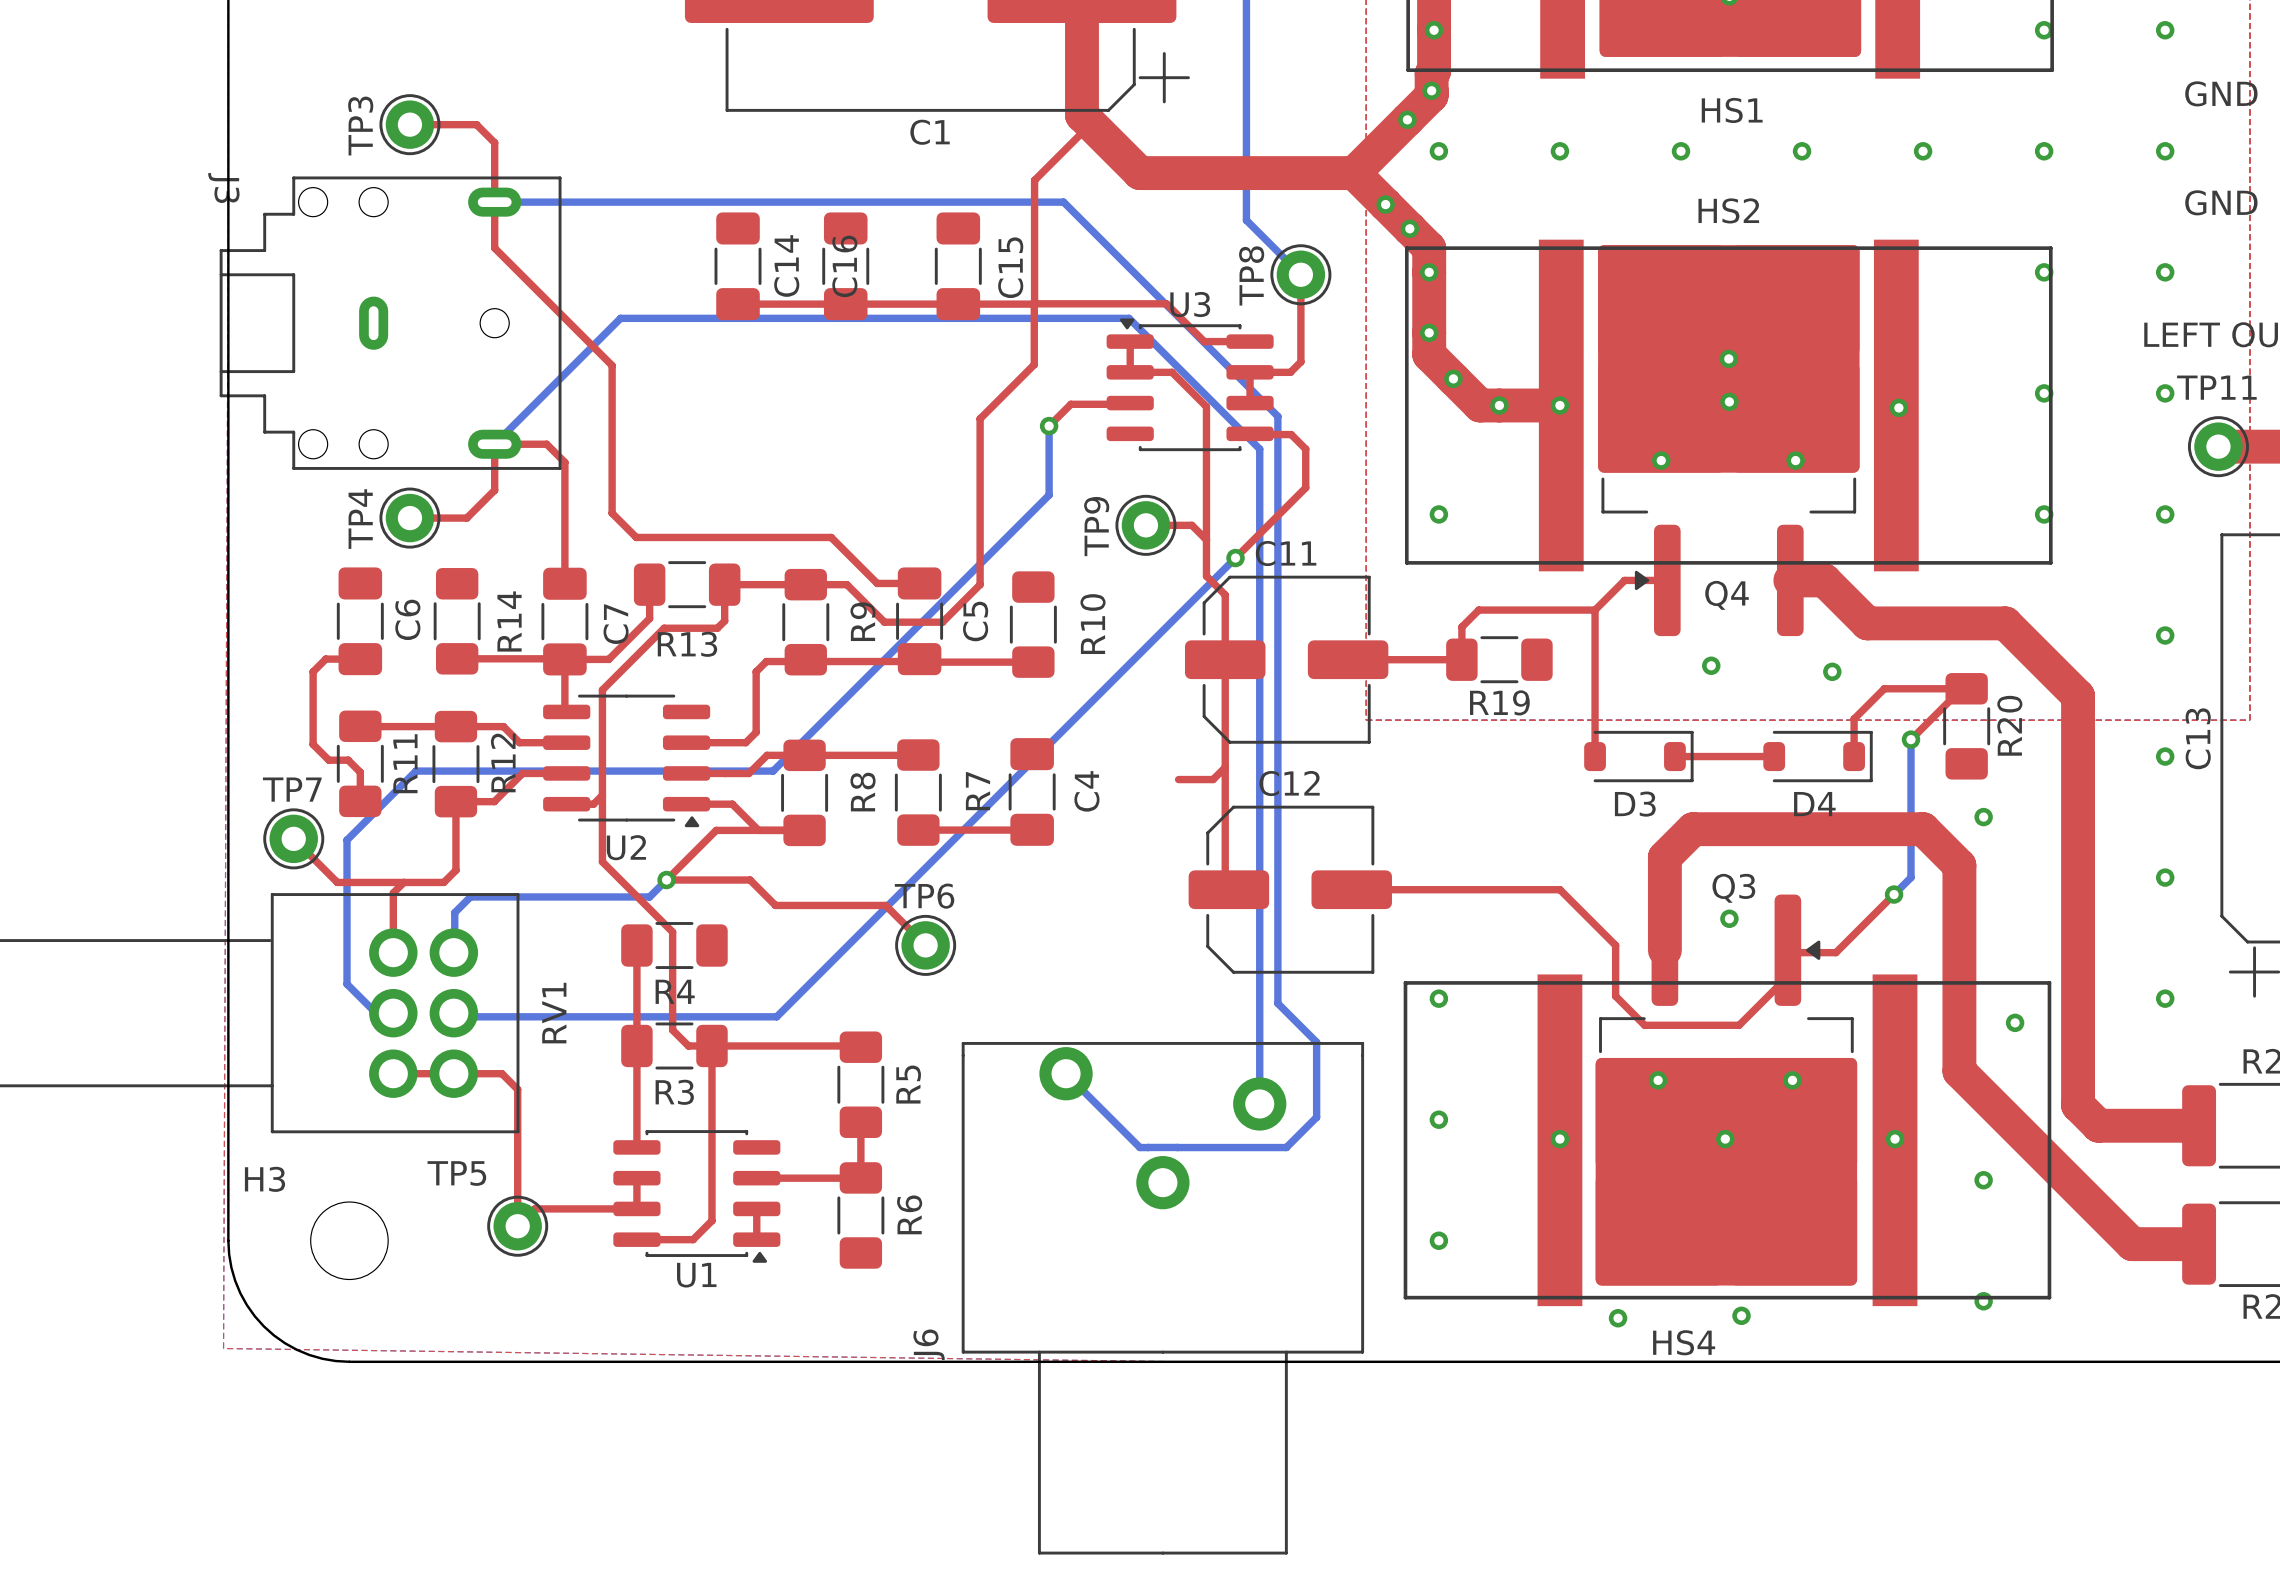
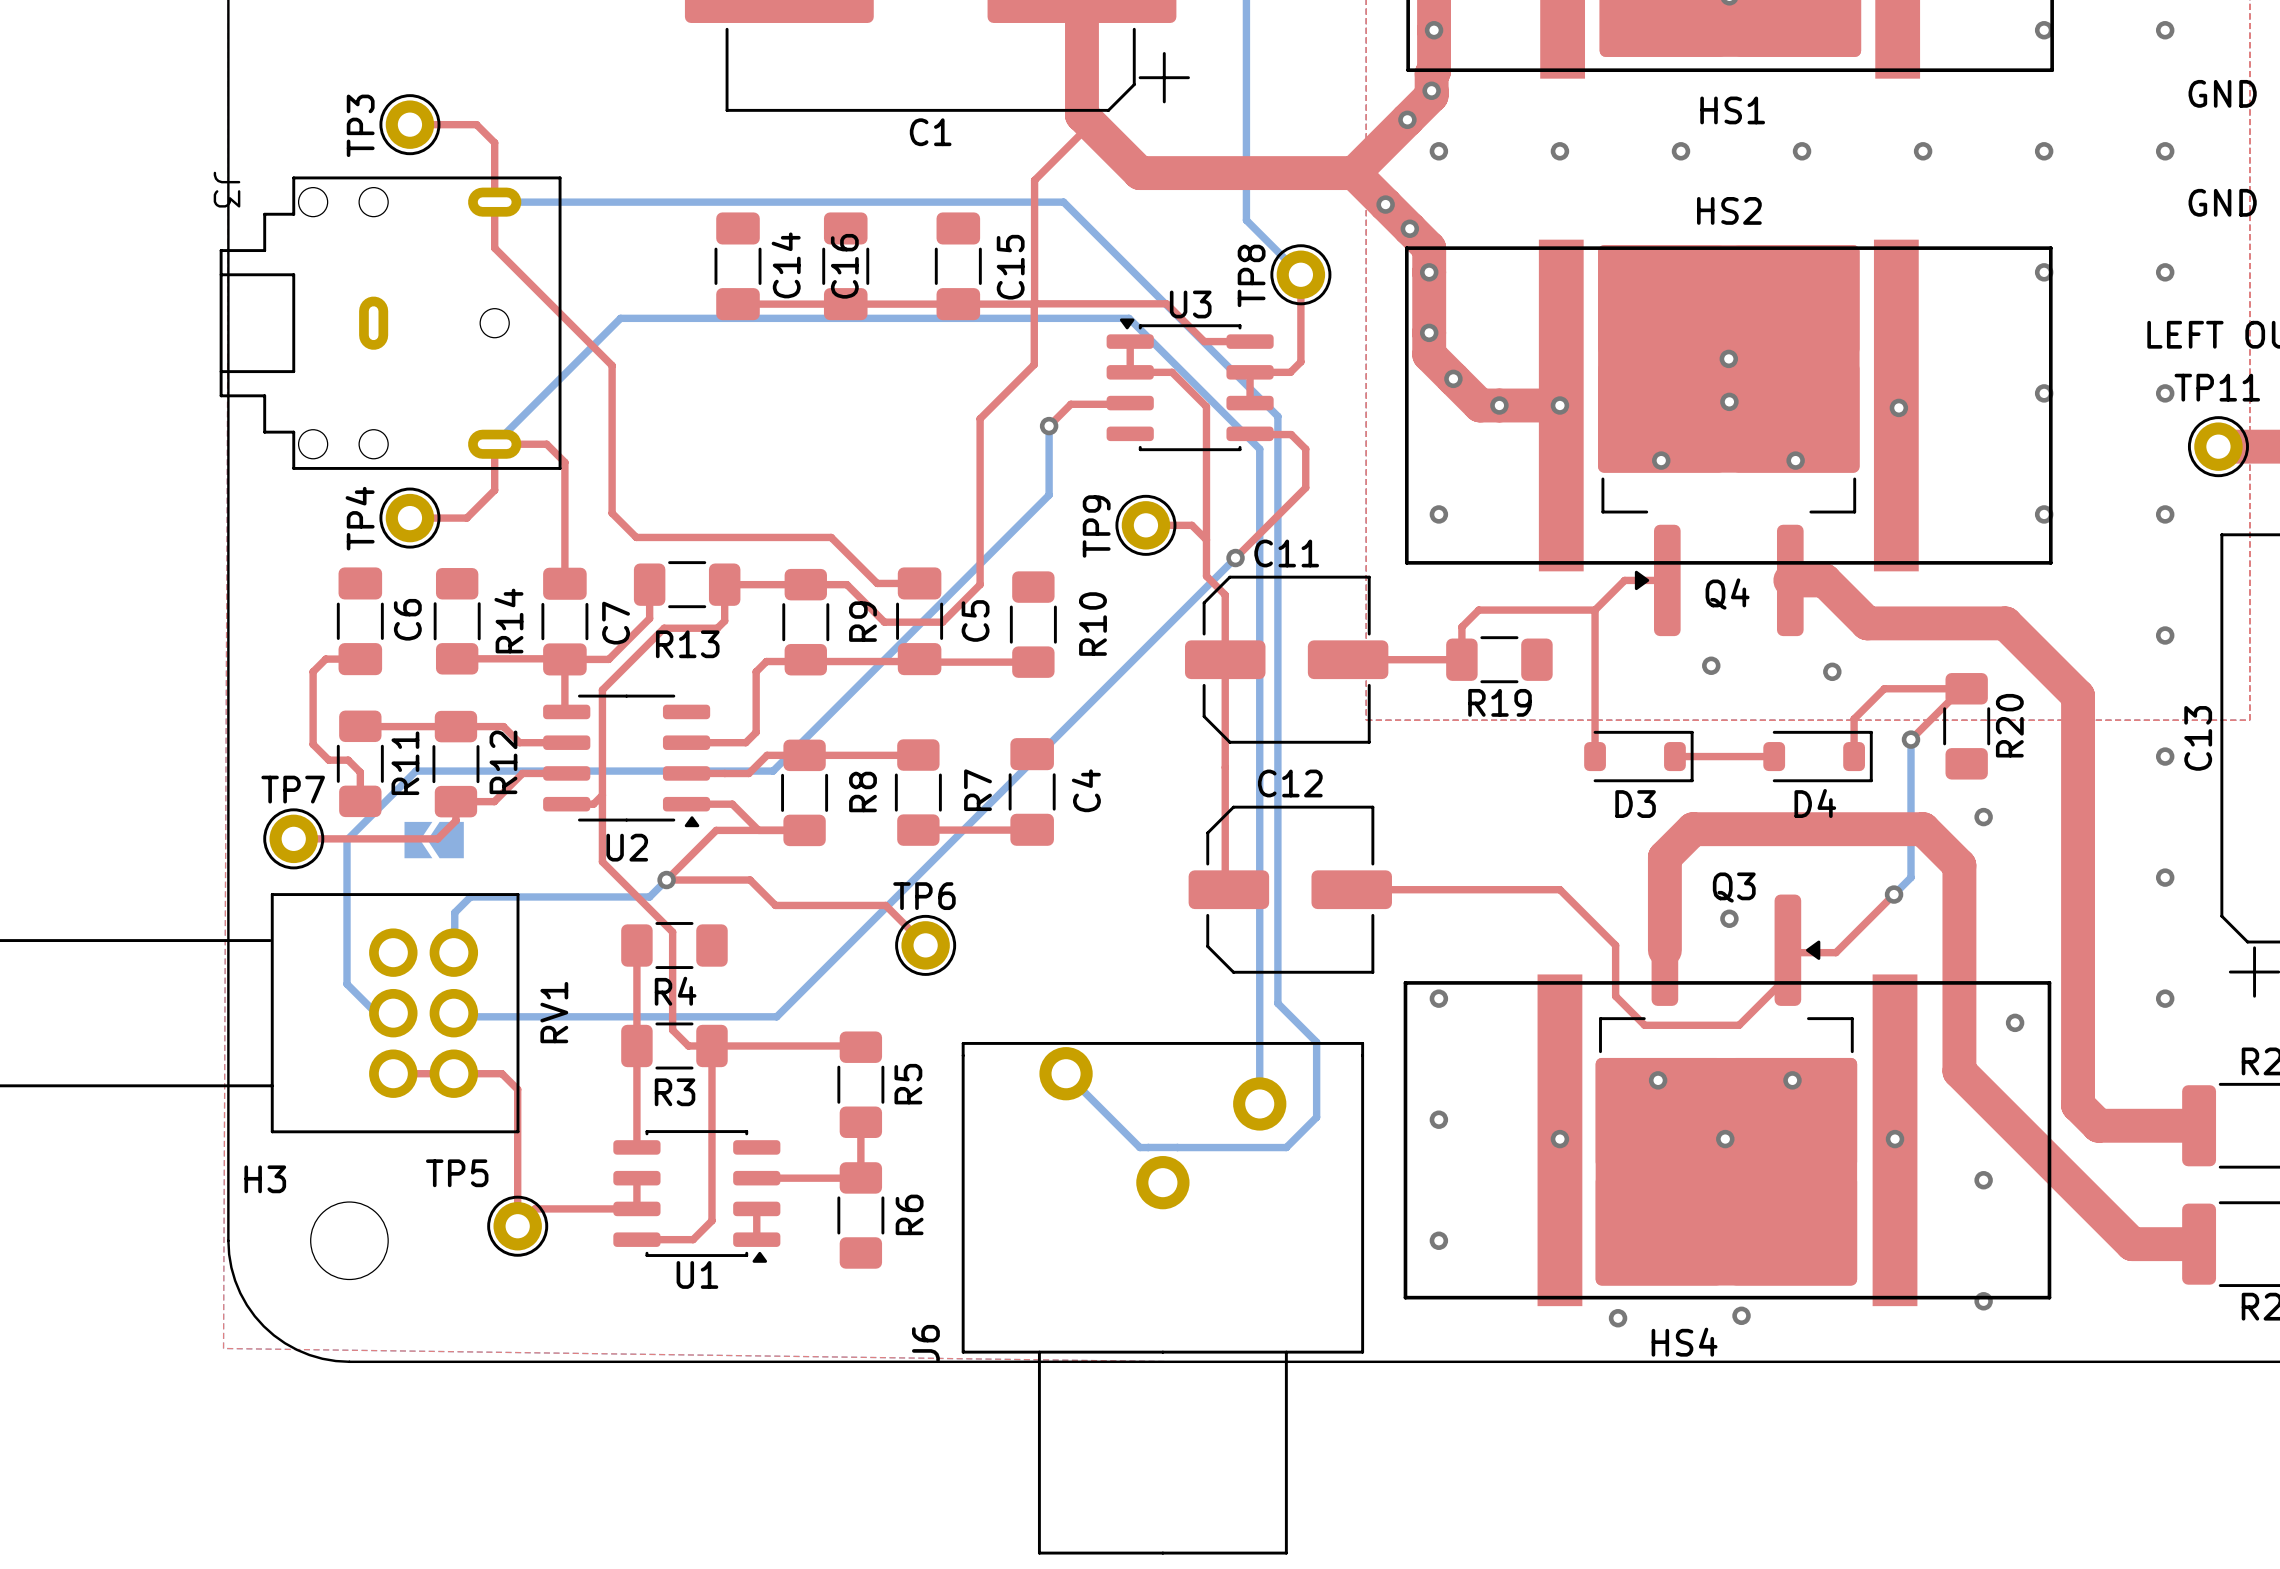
top track: (1225, 767) (1213, 779) (1178, 779) -> none
top track: (455, 820) (455, 870) (443, 882) (337, 882) (293, 838) -> (455, 820) (437, 838) (293, 838)
part: none -> (434, 840)
top track: (403, 882) (393, 893) (393, 952) -> none

